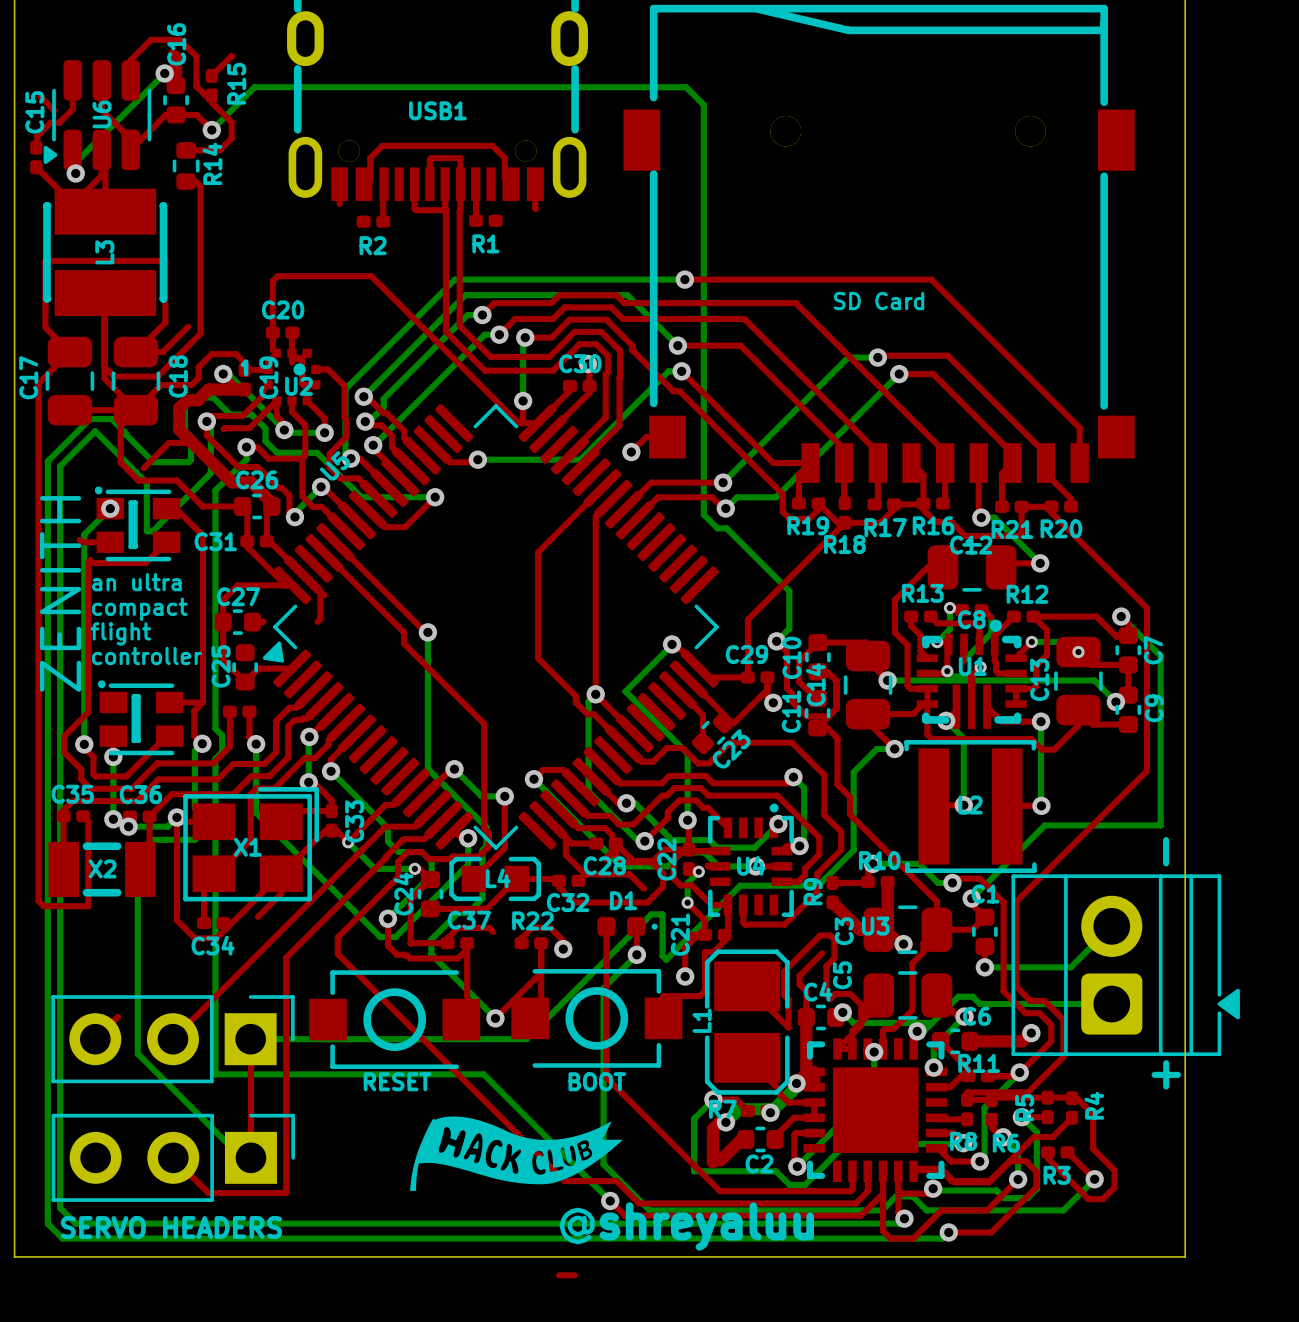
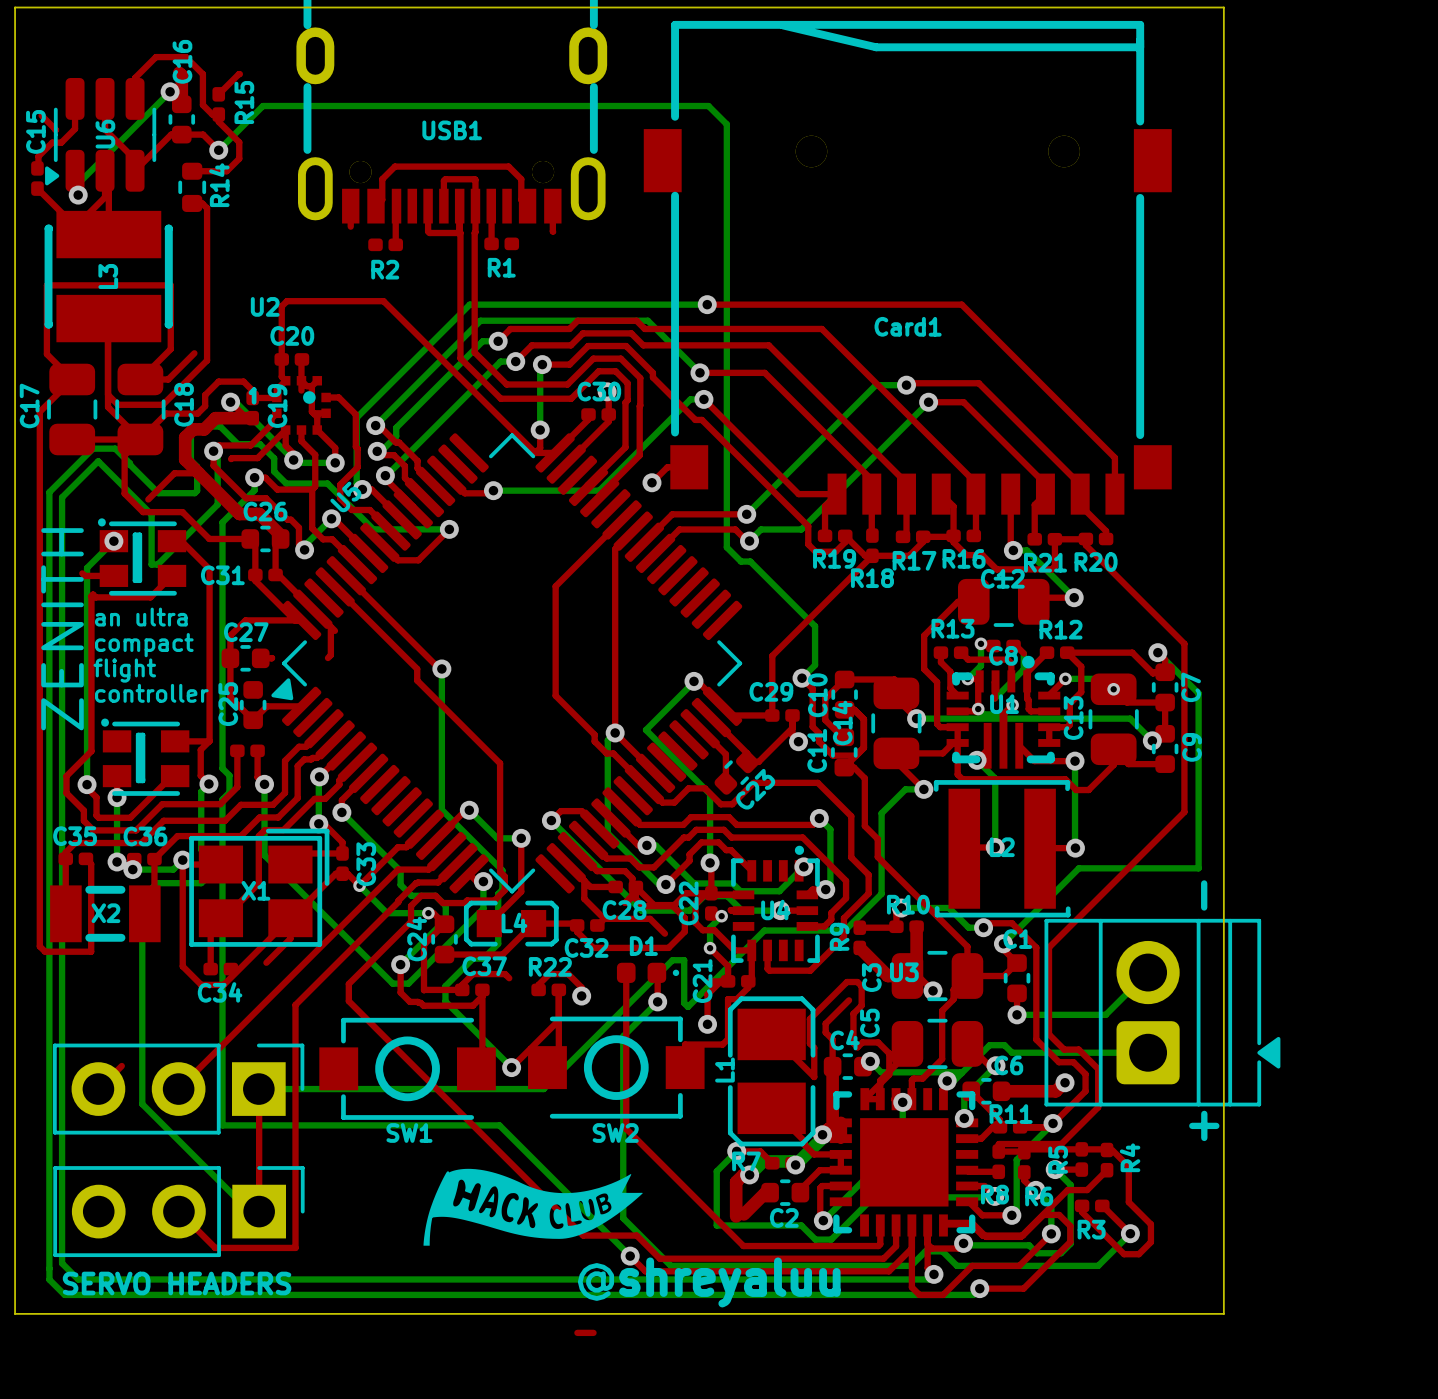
SD Card name: SD Card (879, 301) -> Card1 (908, 326)
U2 name position: U2 (299, 386) -> U2 (265, 306)
RESET name: RESET (397, 1081) -> SW1 (409, 1133)
BOOT name: BOOT (597, 1081) -> SW2 (615, 1133)

